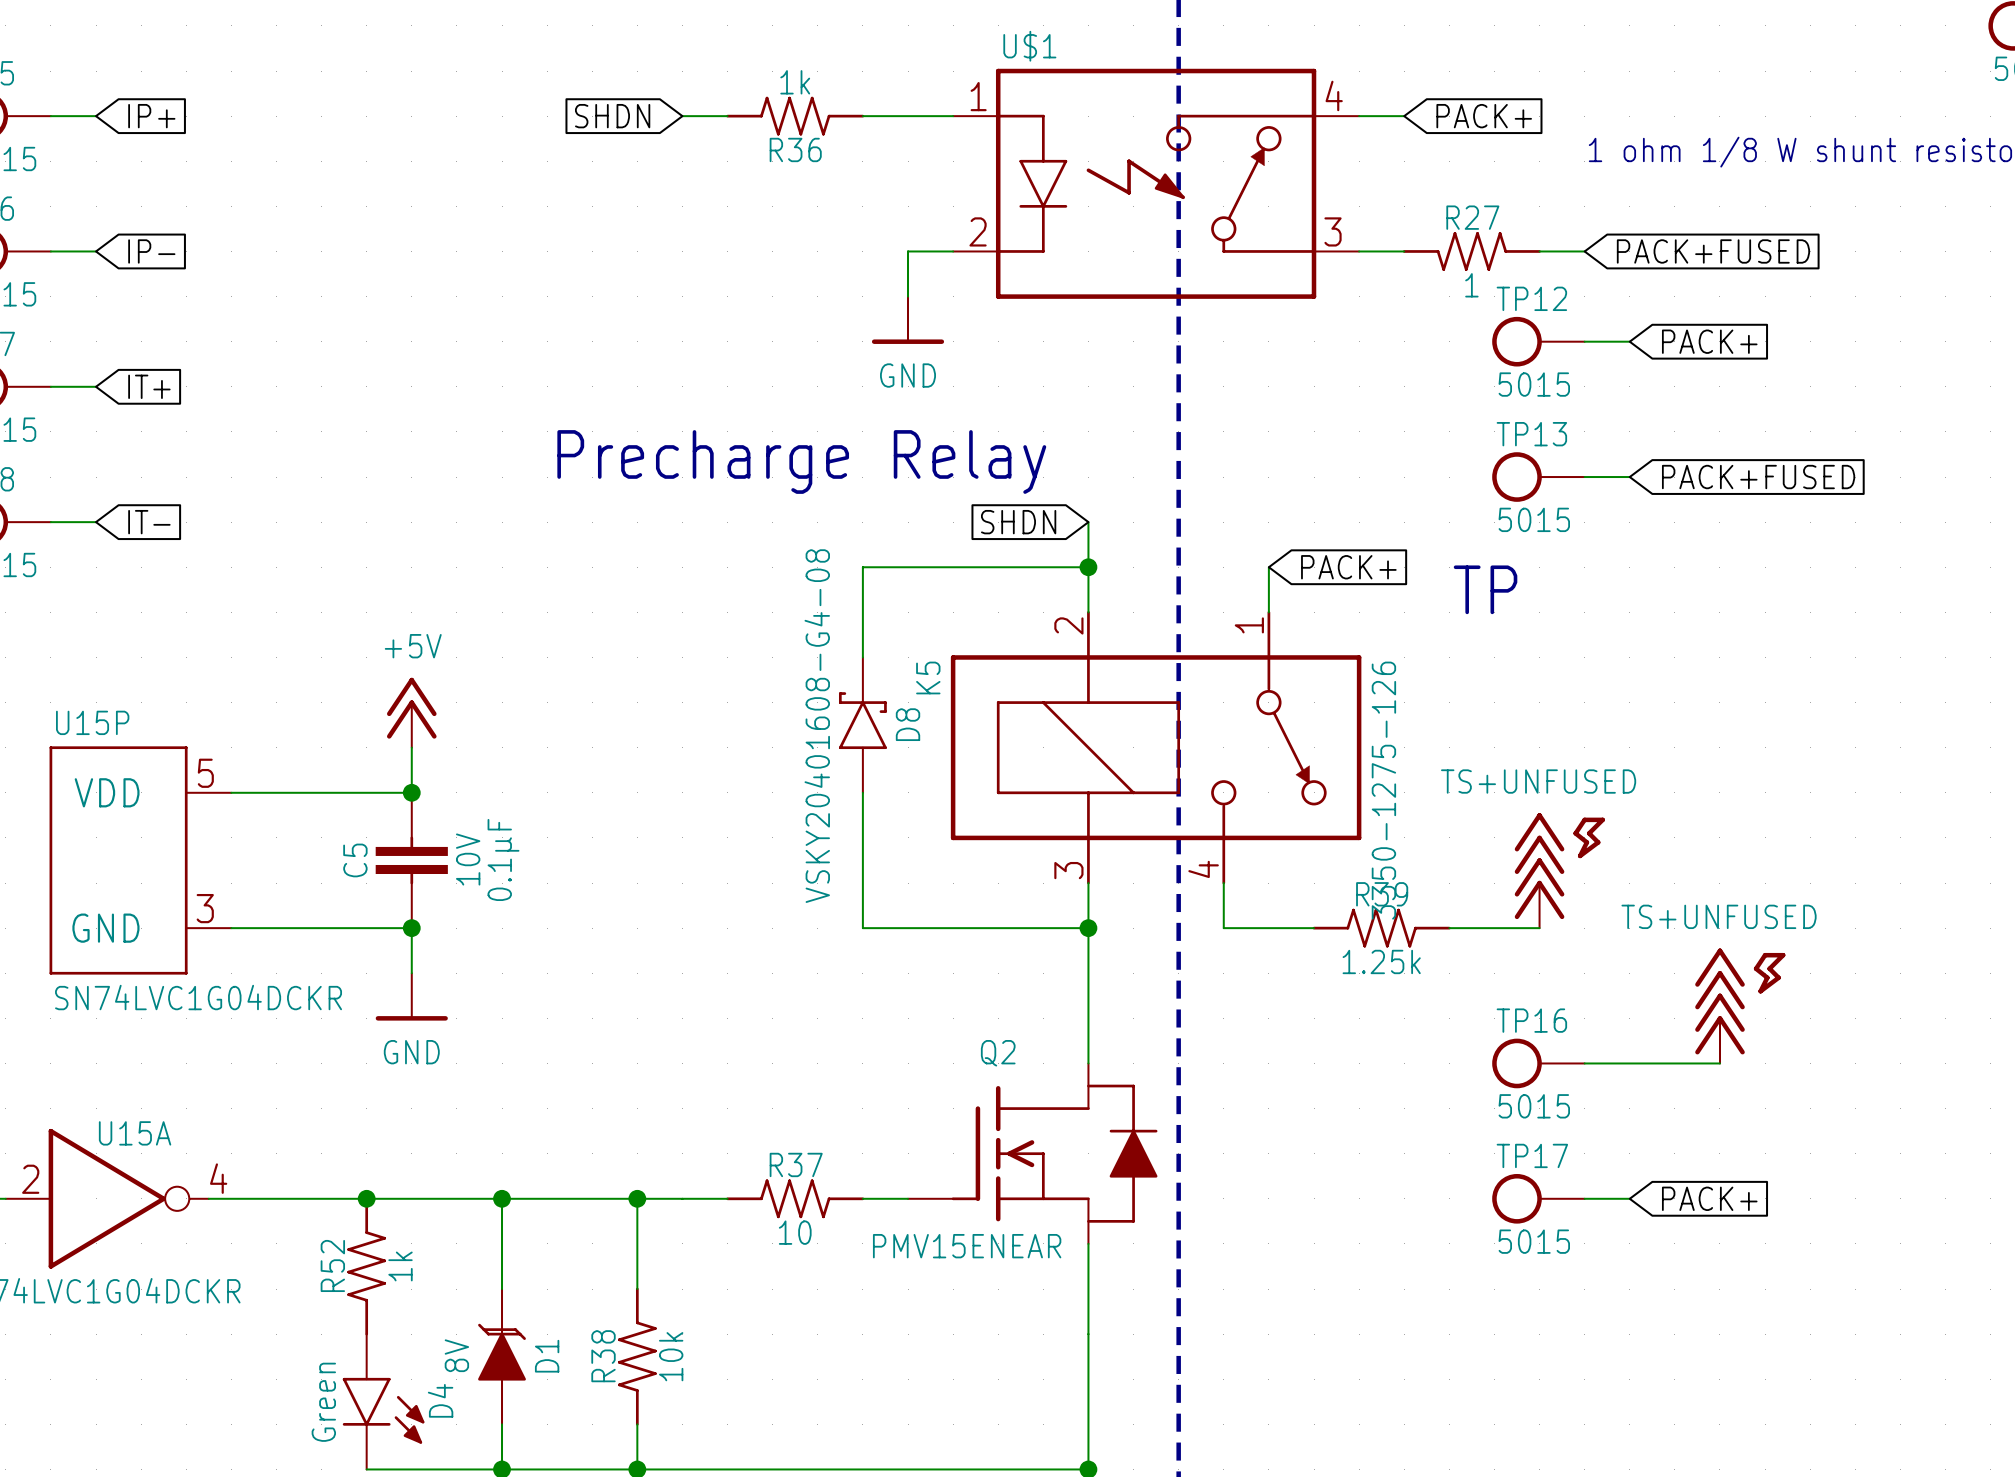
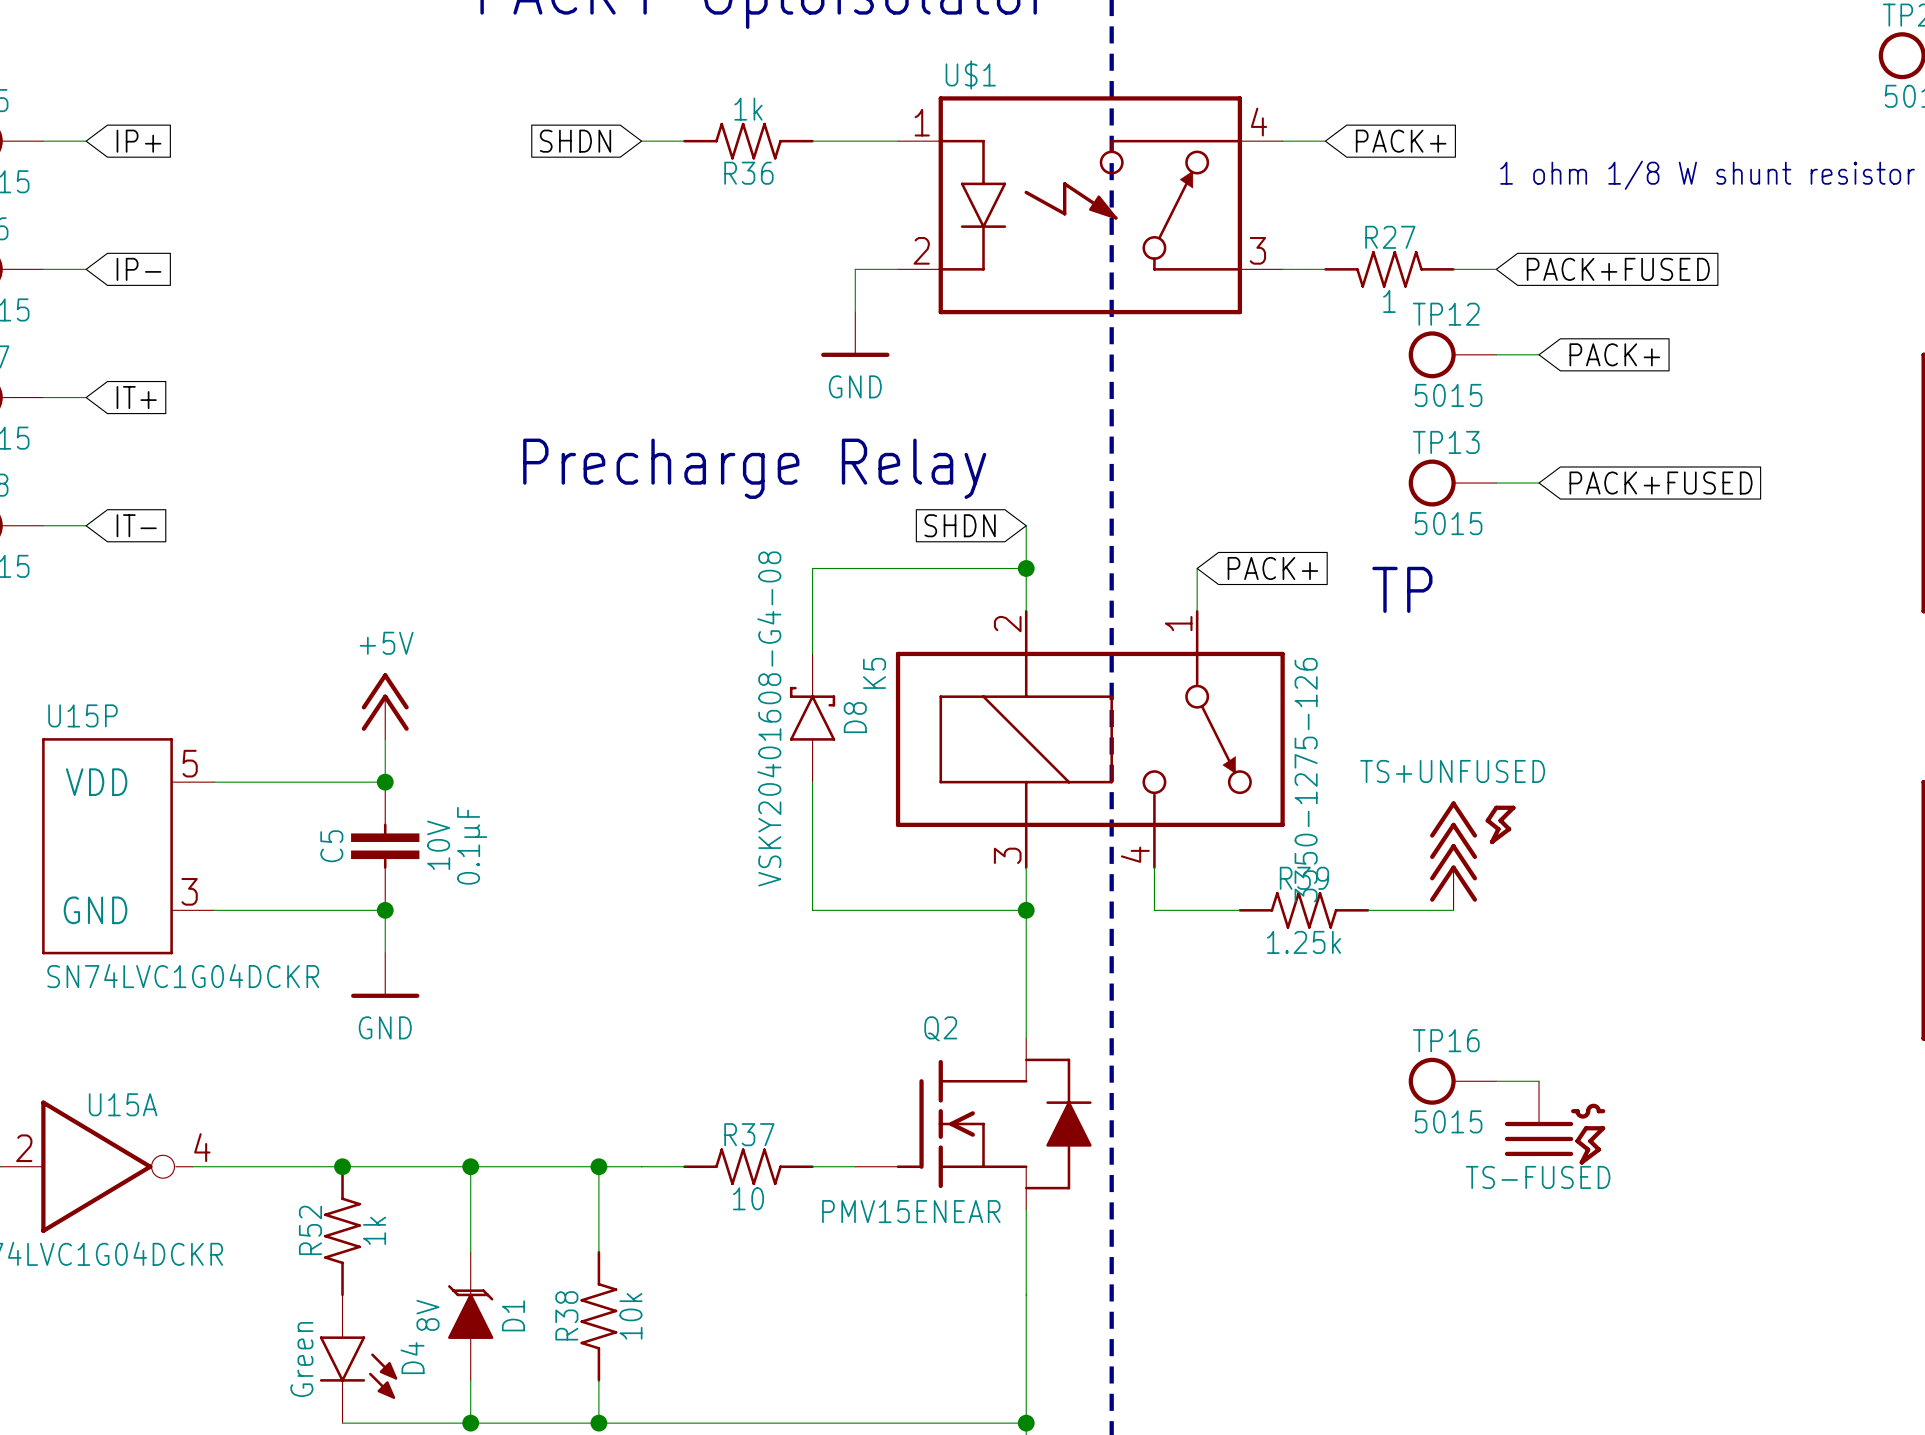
power symbol: TS+UNFUSED (1740, 1005) -> none
TP16 position: (1538, 1063) -> (1452, 1081)
wire: (1584, 1063) (1719, 1063) -> none
power symbol: none -> TS-FUSED (1555, 1122)
TP17: (1538, 1198) -> none
wire: (1584, 1198) (1629, 1198) -> (1496, 1081) (1539, 1081)
global label: PACK+ (1709, 1198) -> none

